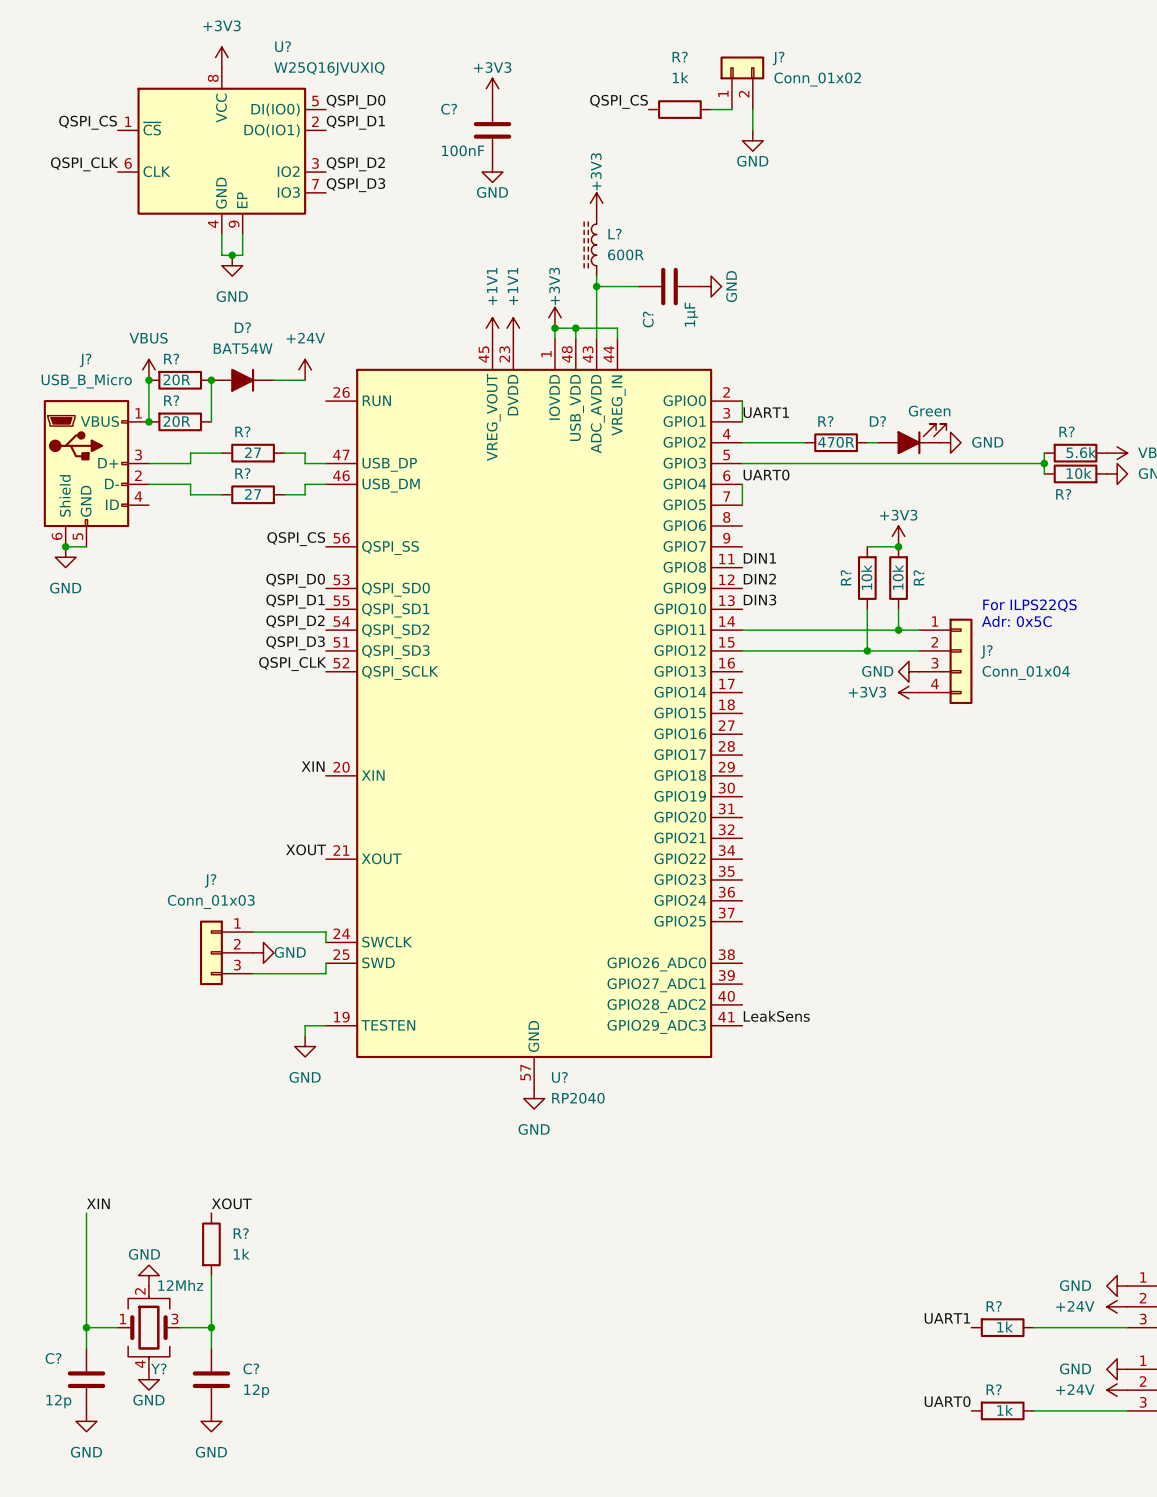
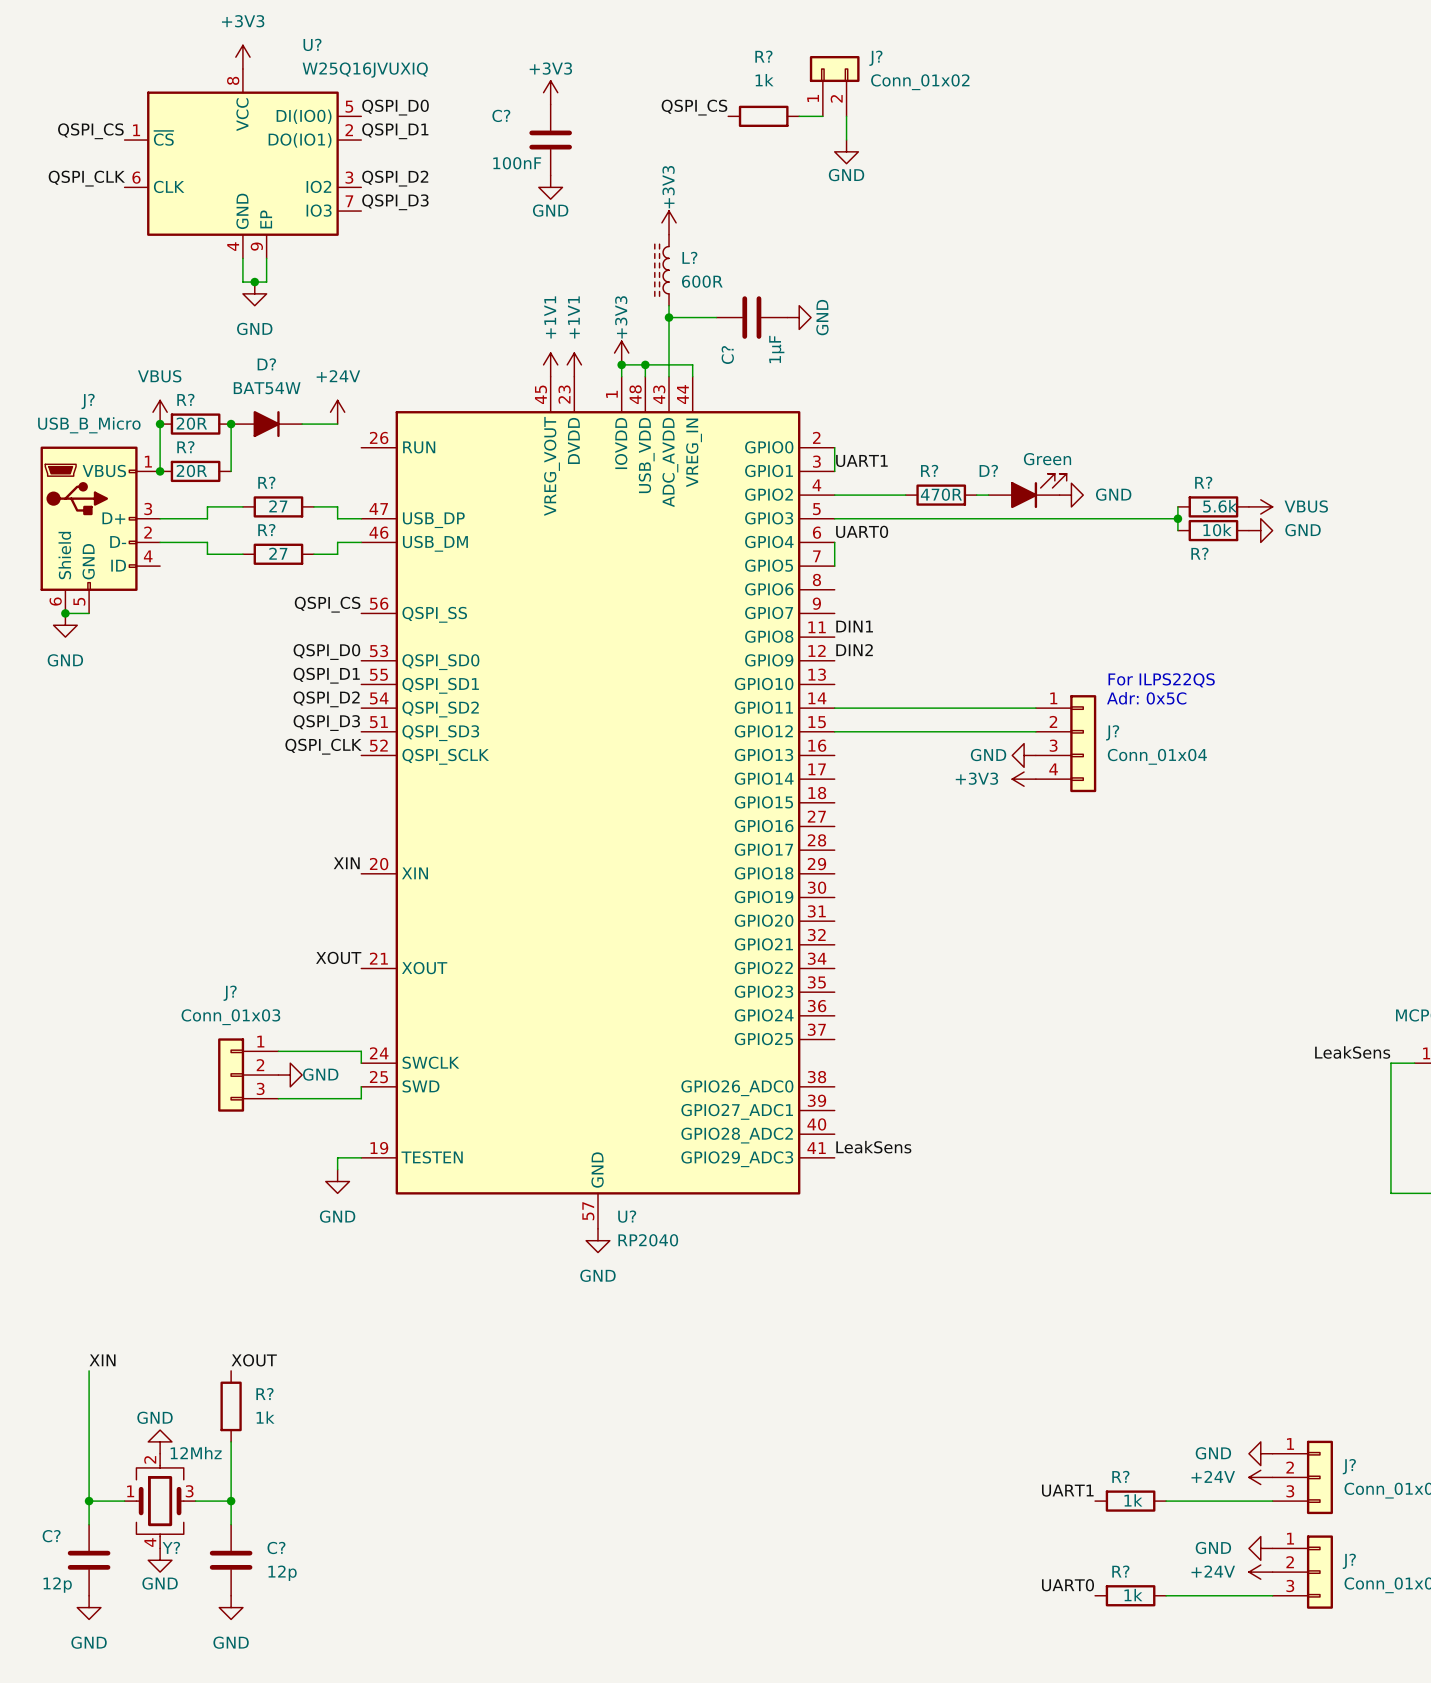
power symbol: +3V3 (898, 536) -> none
wire: (867, 546) (898, 546) -> none
junction: (898, 546) -> none
R?: 10k (867, 578) -> none
R?: 10k (898, 578) -> none
label: DIN3 (760, 600) -> none
wire: (867, 609) (867, 650) -> none
wire: (898, 609) (898, 630) -> none
junction: (898, 630) -> none
junction: (867, 650) -> none

